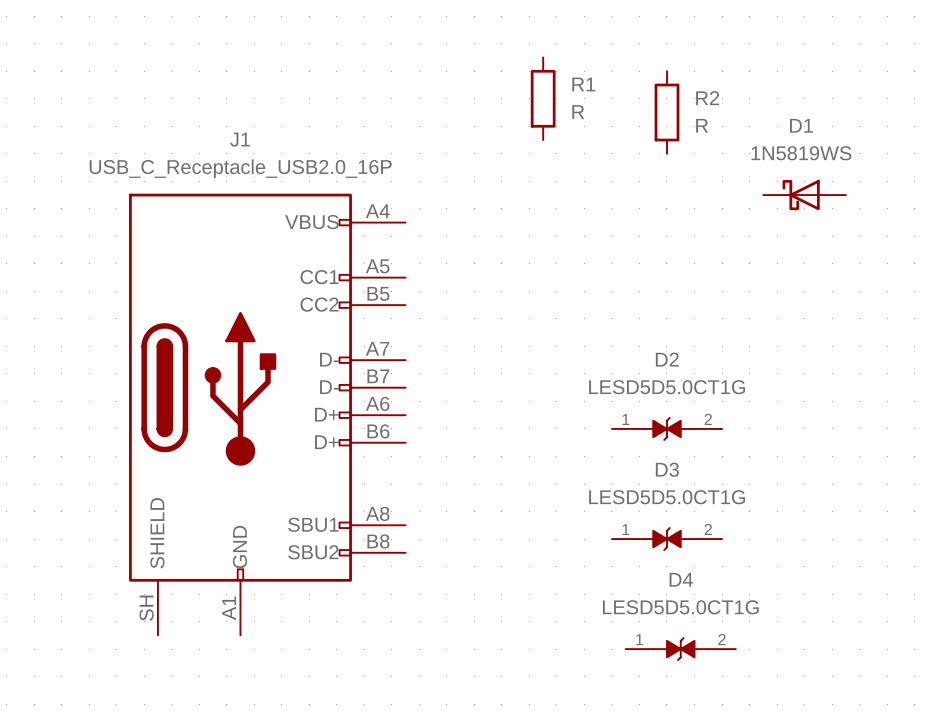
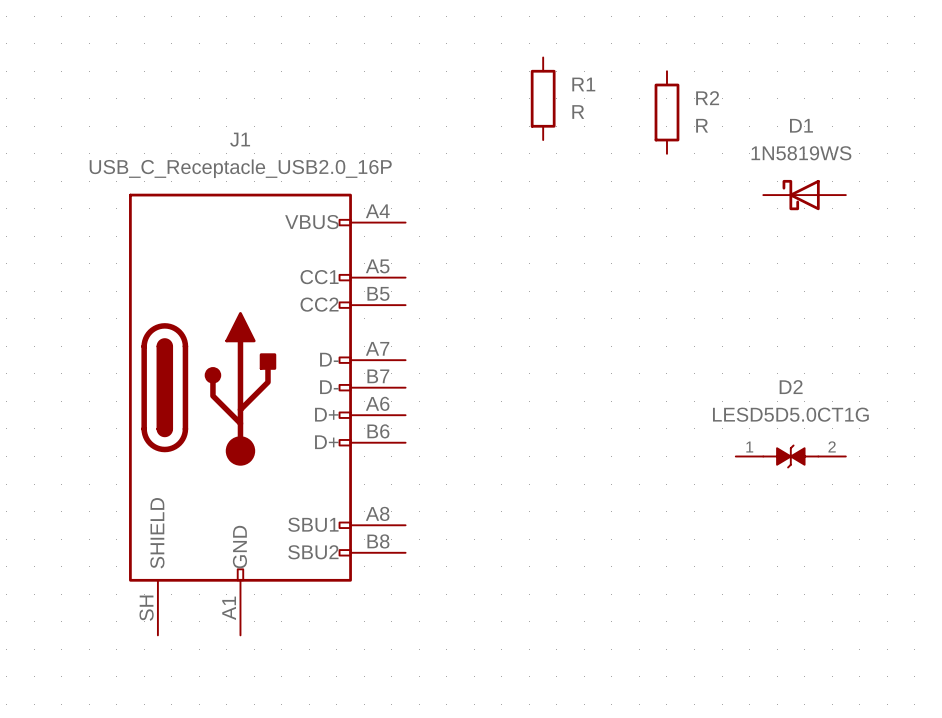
D2 position: (666, 428) -> (790, 456)
D3: LESD5D5.0CT1G (666, 539) -> none
D4: LESD5D5.0CT1G (680, 649) -> none

